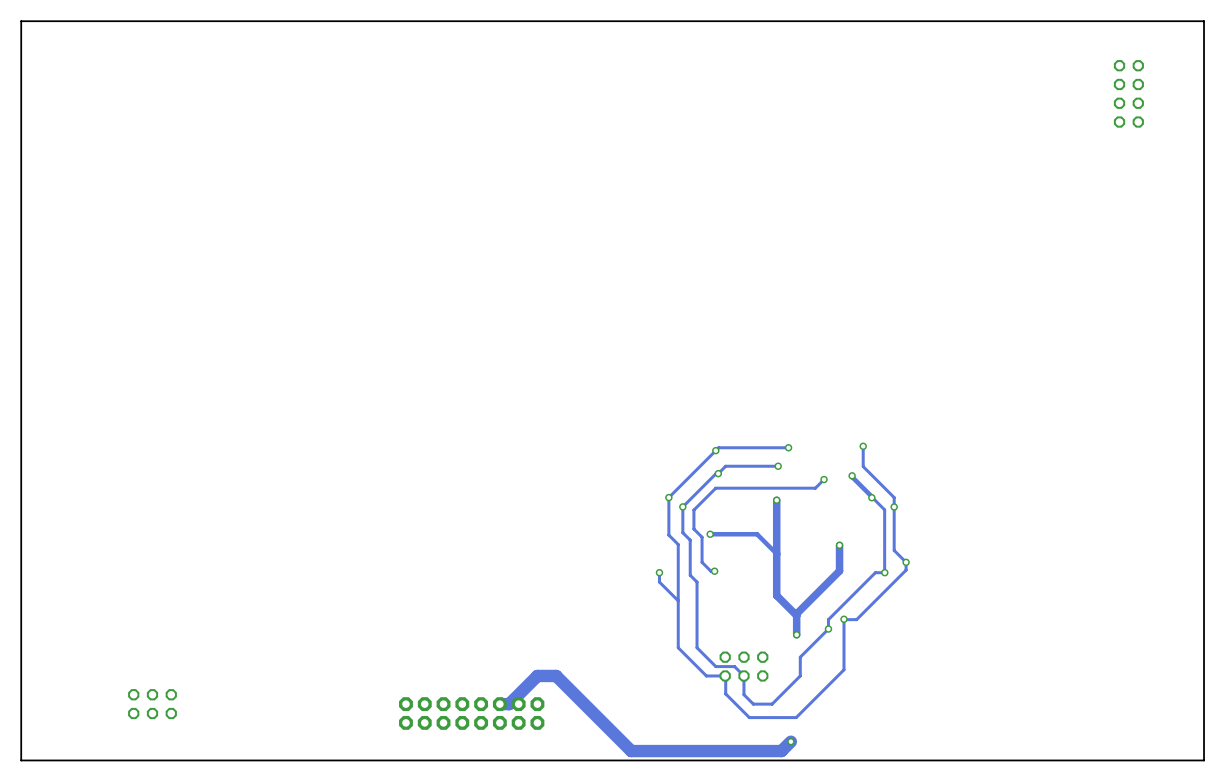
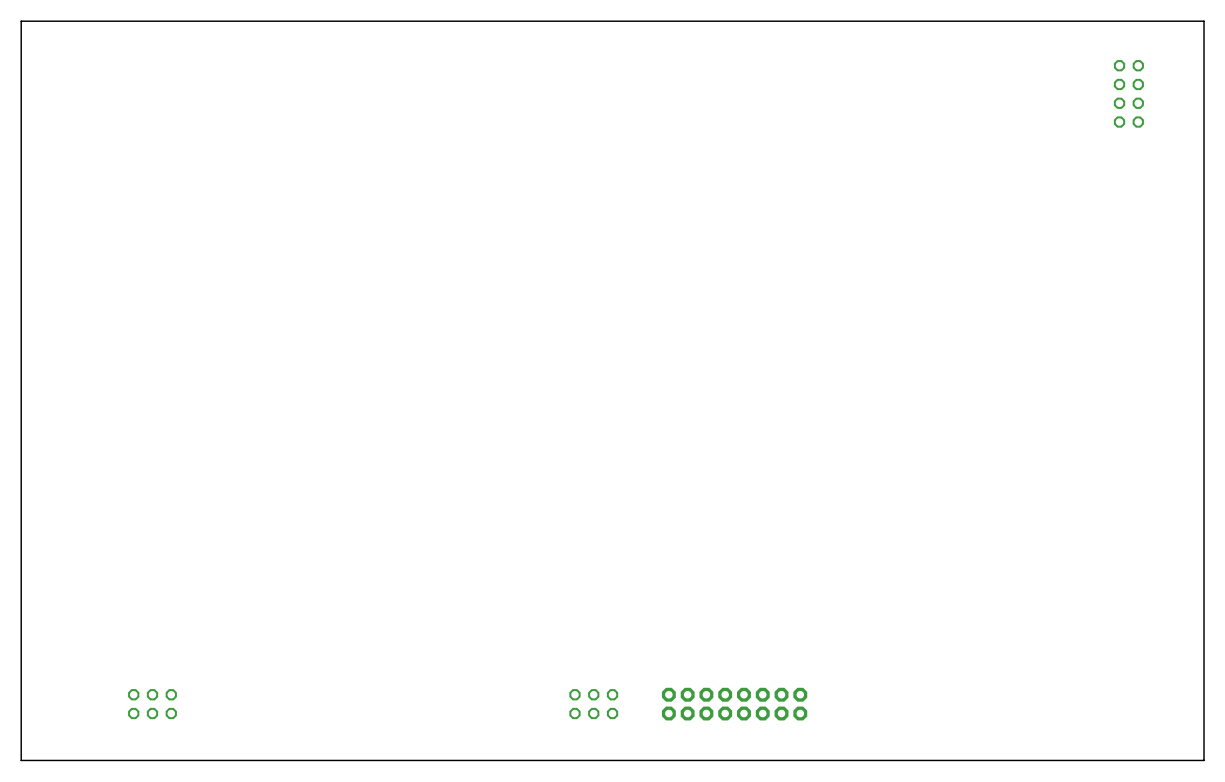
track: (863, 446) (863, 466) (894, 497) (894, 550) (906, 562) (906, 570) (856, 619) (843, 619) (843, 669) (796, 717) (749, 717) (725, 693) (725, 675) (706, 675) (678, 647) (678, 544) (668, 535) (668, 497) (718, 447) (788, 447) -> none
via: (863, 446) -> none
via: (788, 447) -> none
via: (715, 450) -> none
track: (778, 466) (725, 466) (682, 506) (682, 532) (690, 540) (690, 575) (697, 582) (697, 647) (715, 666) (734, 666) (743, 675) (743, 694) (753, 704) (772, 704) (800, 675) (800, 657) (828, 629) (828, 619) (875, 572) (884, 572) (884, 509) (872, 498) (852, 478) (852, 475) (871, 497) -> none
via: (778, 466) -> none
via: (718, 473) -> none
via: (852, 475) -> none
track: (824, 479) (815, 488) (715, 488) (693, 510) (693, 529) (702, 537) (702, 562) (710, 571) (714, 571) -> none
via: (824, 479) -> none
via: (668, 497) -> none
via: (871, 497) -> none
track: (776, 500) (776, 595) (796, 615) -> none
via: (776, 500) -> none
via: (682, 506) -> none
via: (894, 506) -> none
track: (710, 534) (757, 534) (776, 553) -> none
via: (710, 534) -> none
track: (839, 545) (839, 570) (796, 613) (796, 634) -> none
via: (839, 545) -> none
via: (906, 562) -> none
via: (714, 571) -> none
track: (659, 572) (659, 582) (678, 600) -> none
via: (659, 572) -> none
via: (884, 572) -> none
via: (843, 619) -> none
via: (828, 629) -> none
via: (796, 634) -> none
part position: (743, 666) -> (593, 704)
track: (499, 704) (509, 704) (537, 675) (556, 675) (631, 751) (781, 751) (790, 741) -> none
part: none -> (734, 704)
part: (471, 713) -> none
via: (790, 741) -> none

